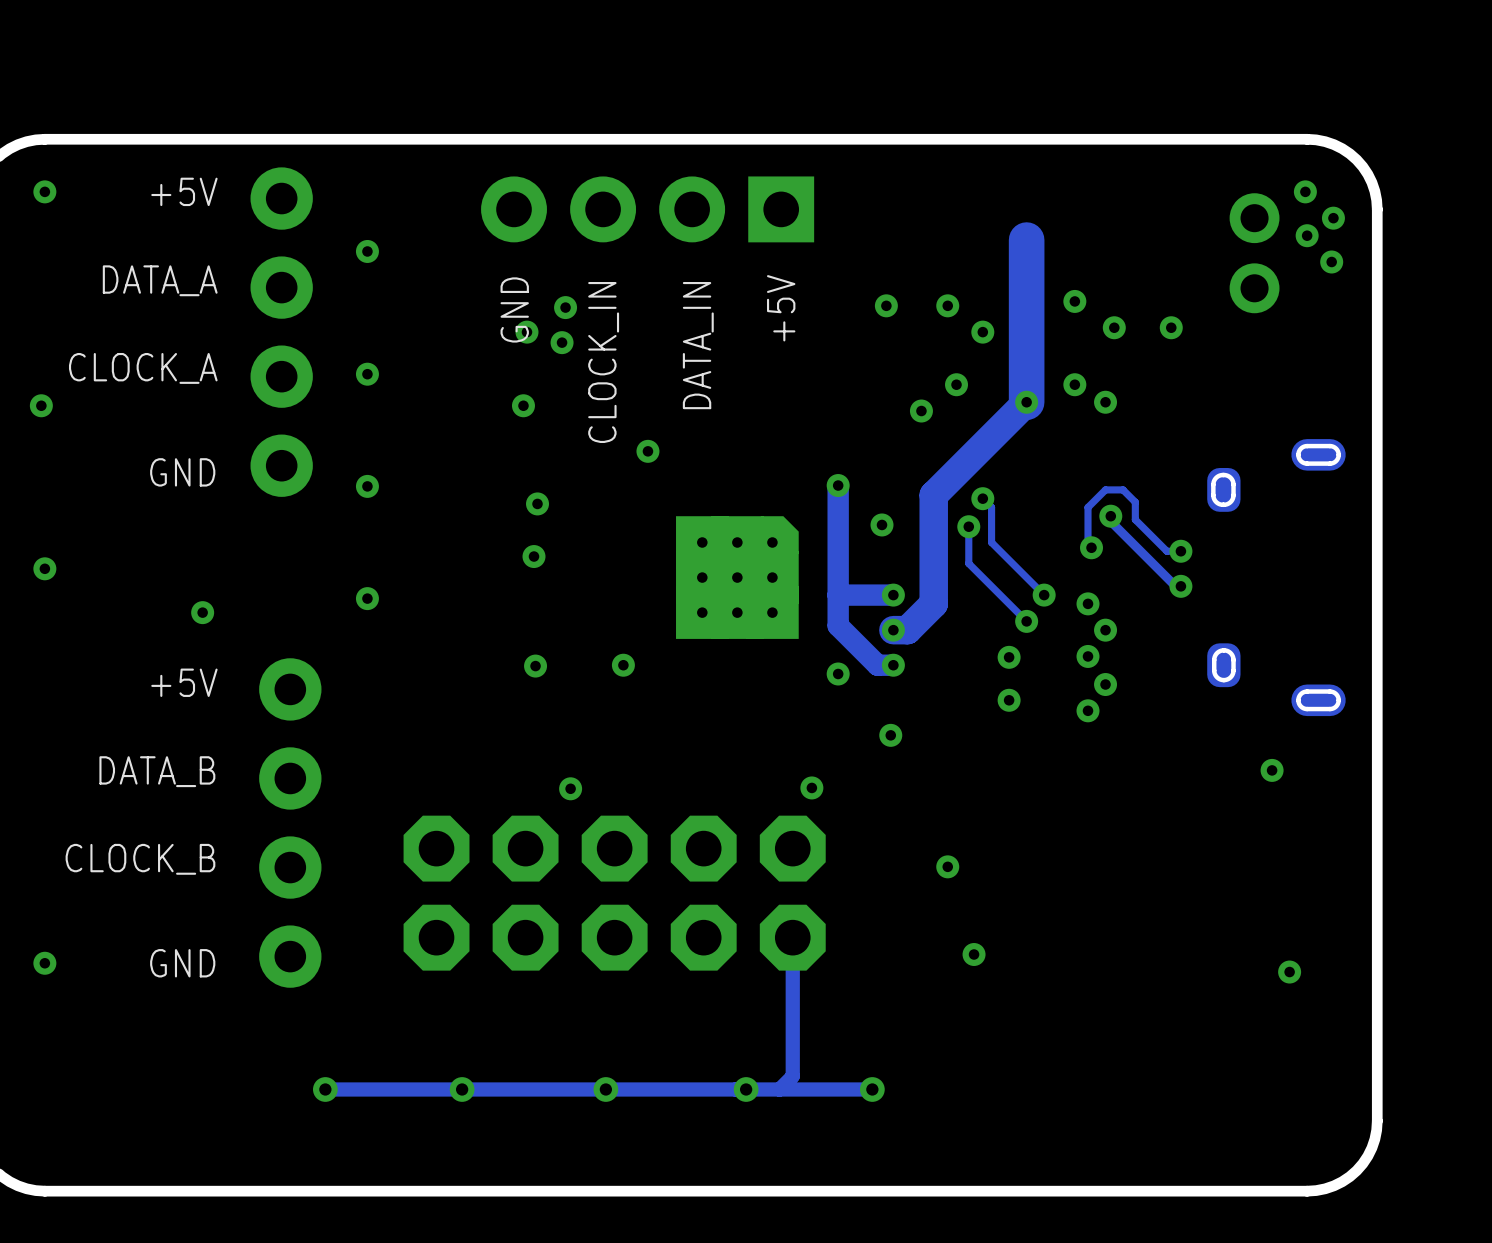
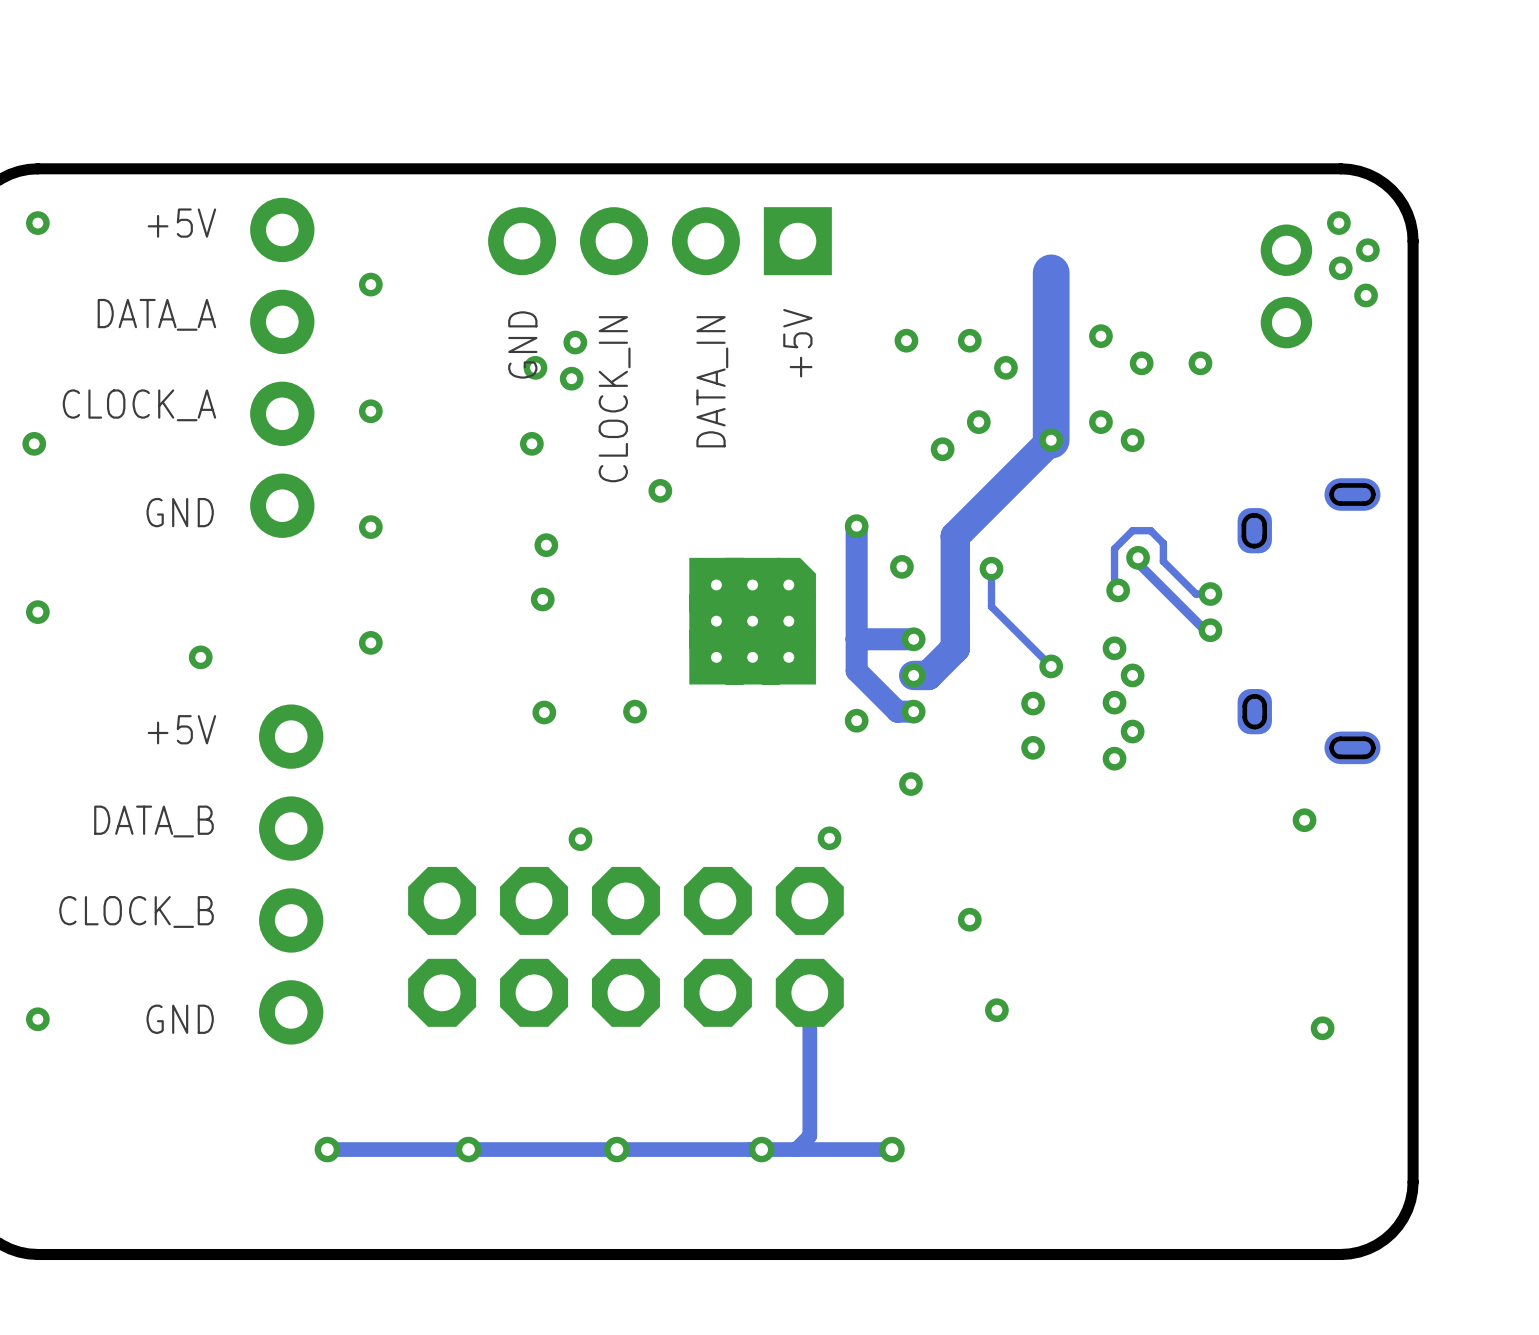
track: (982, 498) (991, 507) (991, 542) (1044, 595) -> none
via: (982, 498) -> none
via: (1044, 595) -> none

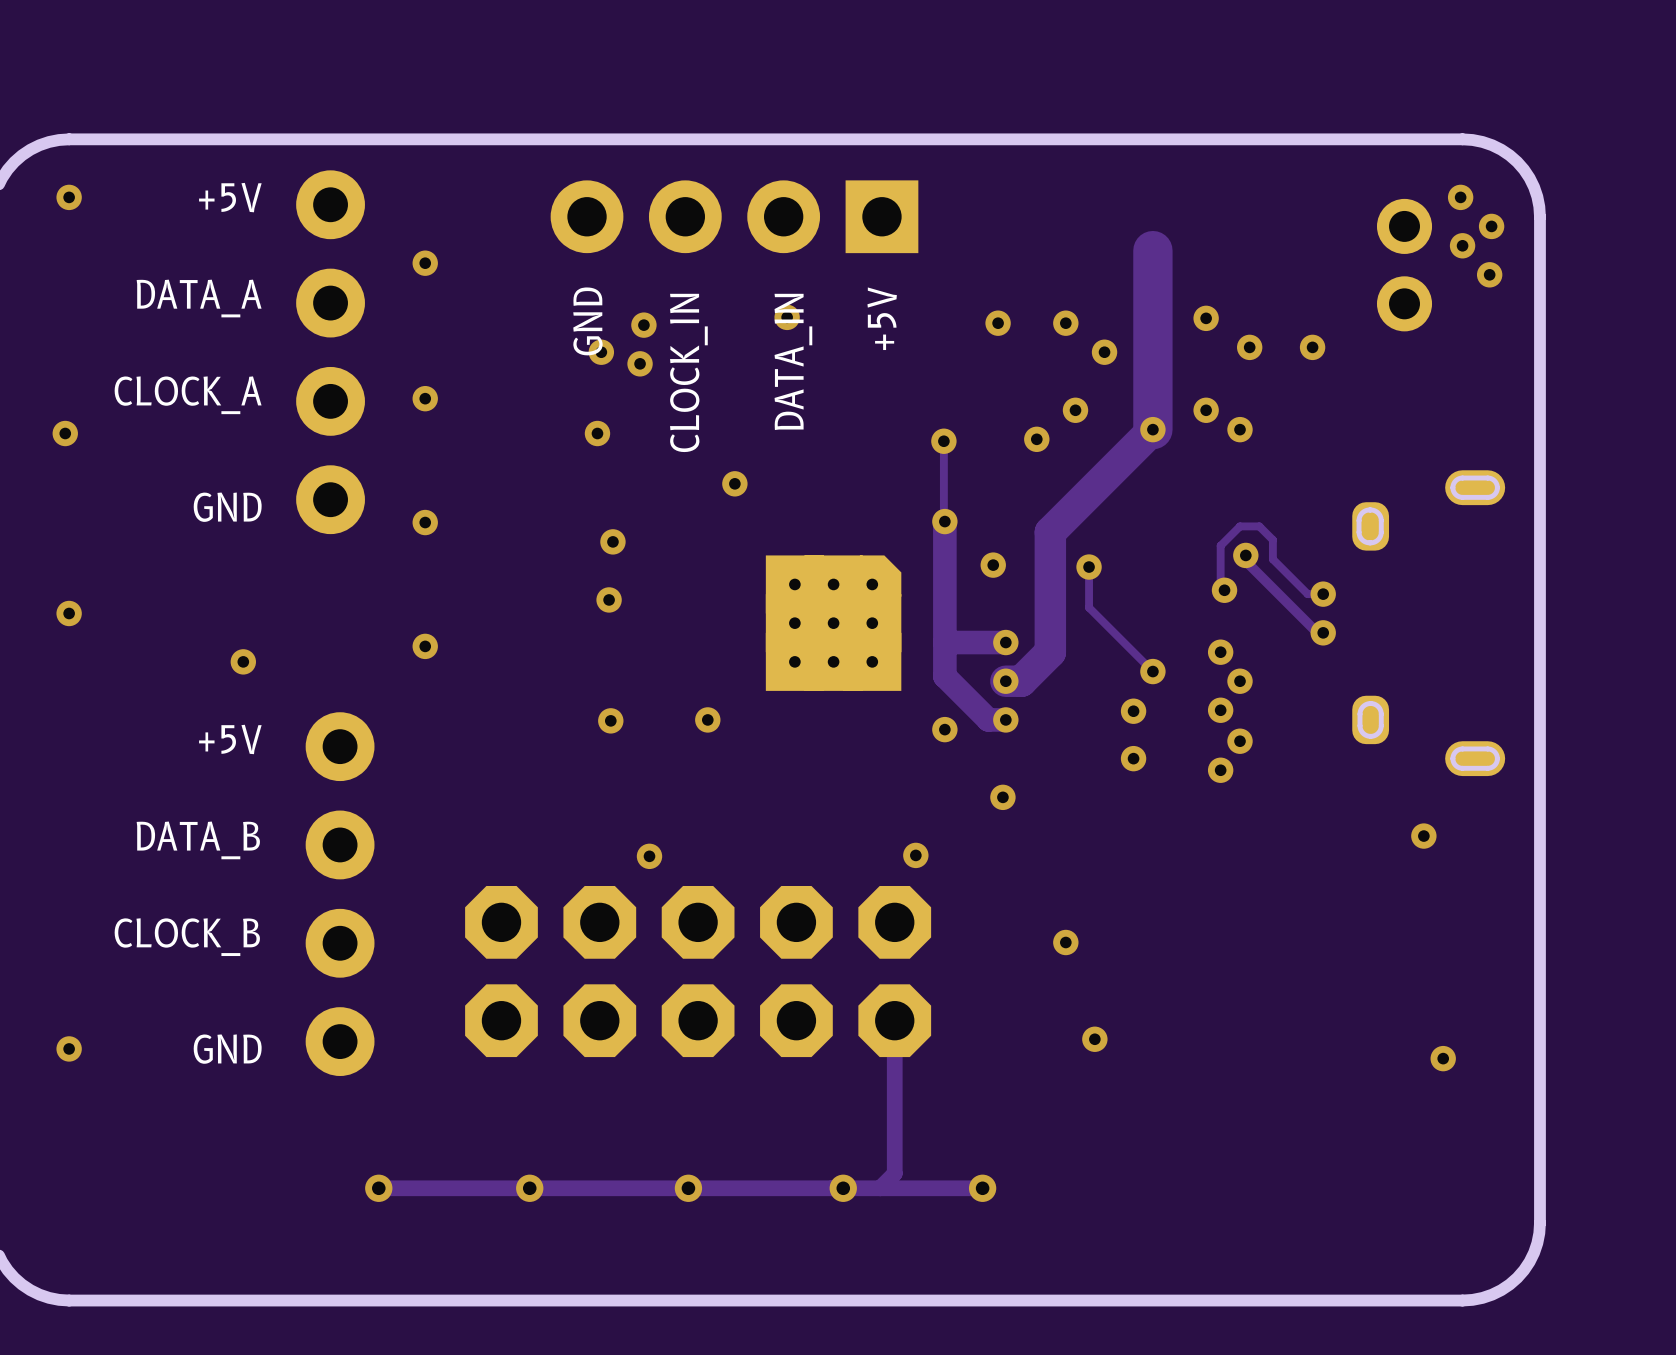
via: none -> (787, 317)
track: none -> (943, 441) (944, 521)
via: none -> (943, 441)

